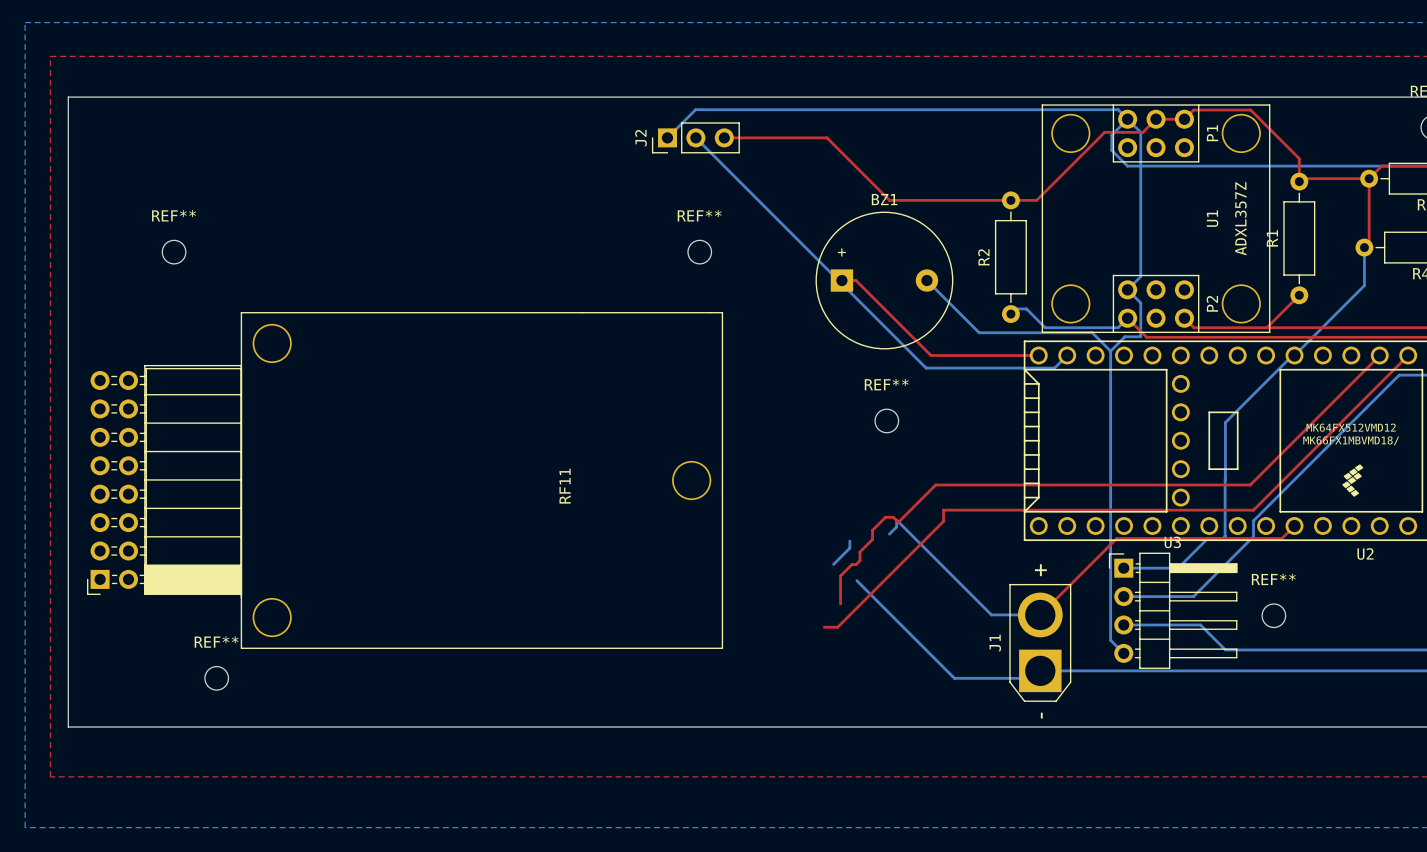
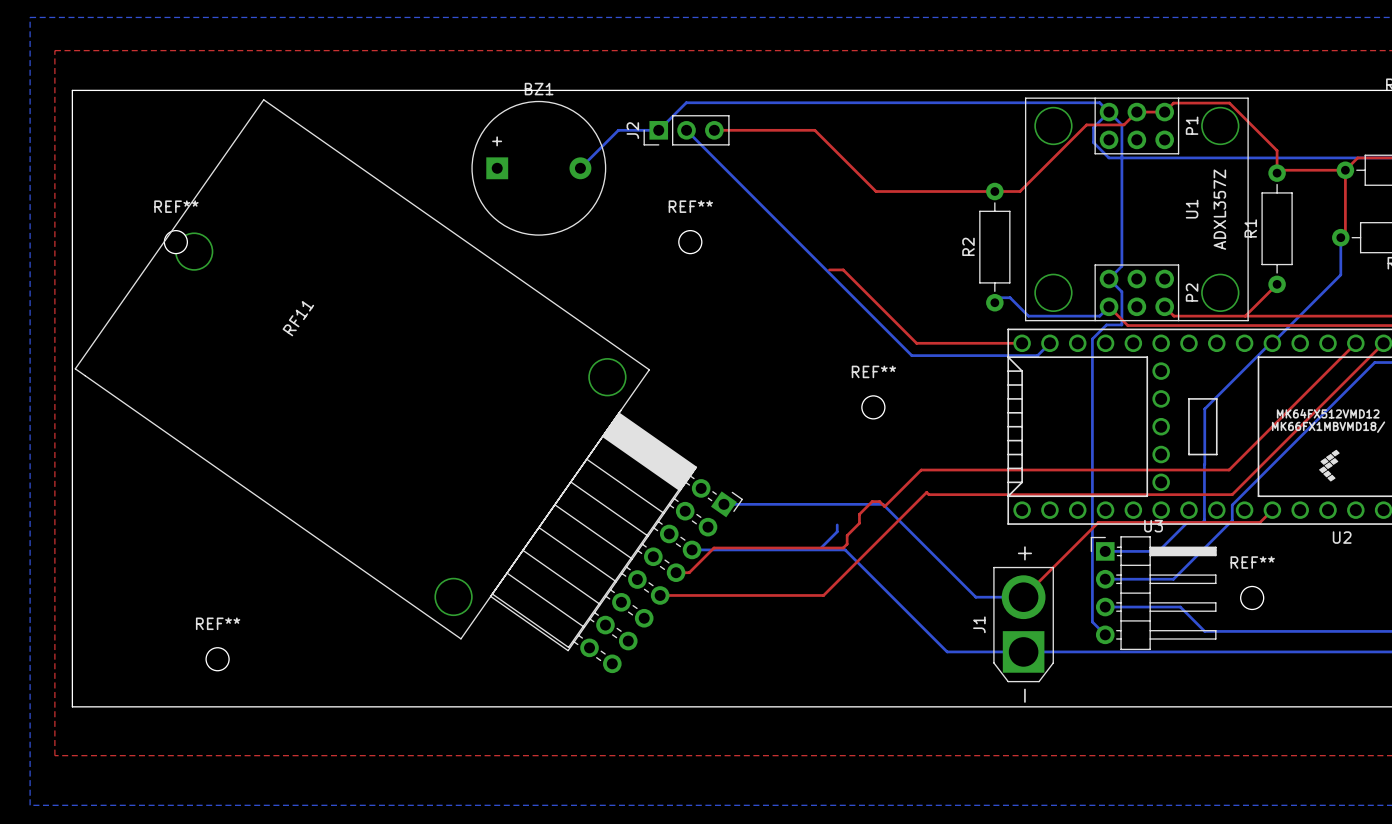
bottom track: none -> (658, 130) (618, 130) (580, 168)
BZ1 position: (884, 280) -> (538, 168)
bottom track: (926, 280) (979, 332) (1092, 332) (1110, 351) -> none
RF11 rotation: 0° (405, 480) -> 145° counterclockwise (408, 386)
RF11 name position: RF11 (565, 486) -> RF11 (298, 318)
top track: (943, 510) (943, 521) (837, 627) (824, 627) -> (928, 494) (926, 492) (823, 595) (660, 595)
bottom track: (896, 520) (896, 526) (889, 534) -> (883, 504) (723, 504)
top track: (851, 564) (840, 576) (840, 603) -> (839, 548) (713, 548) (689, 572) (676, 572)
bottom track: (856, 580) (954, 678) (1026, 678) (1033, 670) -> (692, 549) (845, 549) (947, 651) (1017, 651)

